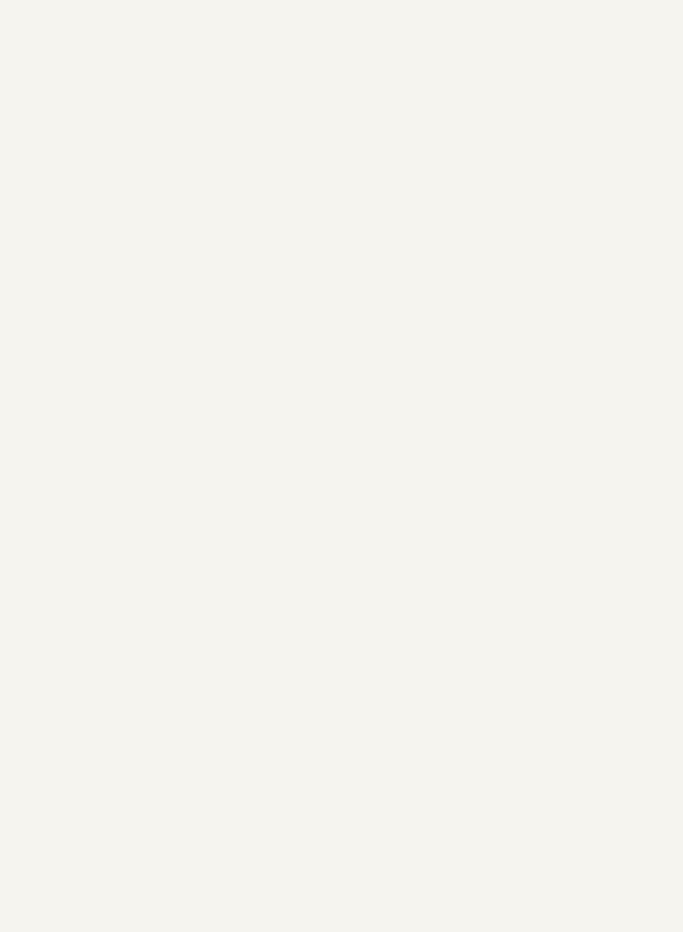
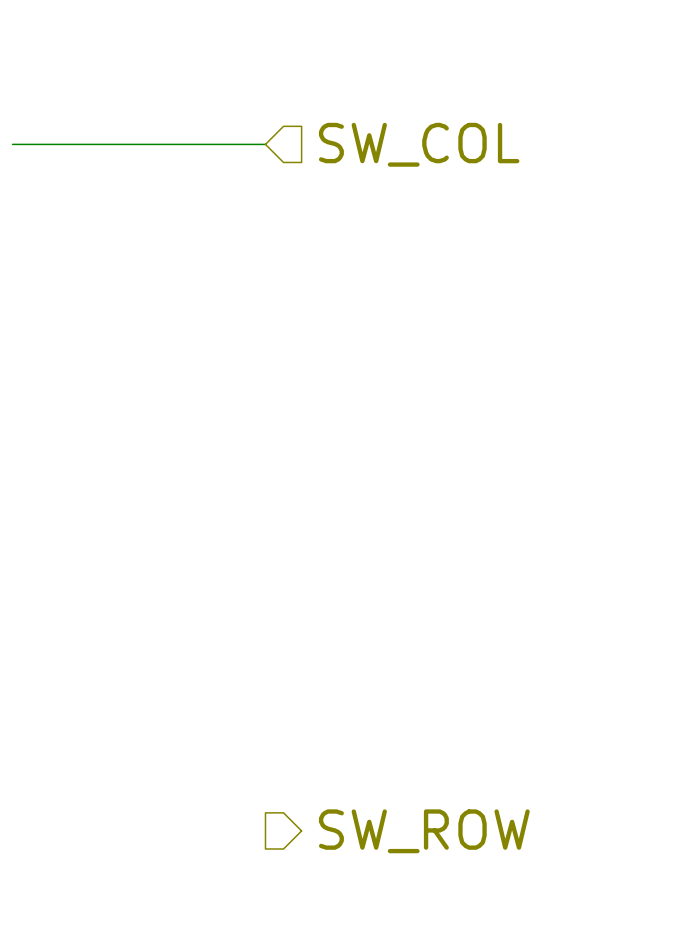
wire: none -> (12, 144) (265, 144)
hierarchical label: none -> SW_COL (419, 144)
hierarchical label: none -> SW_ROW (424, 831)

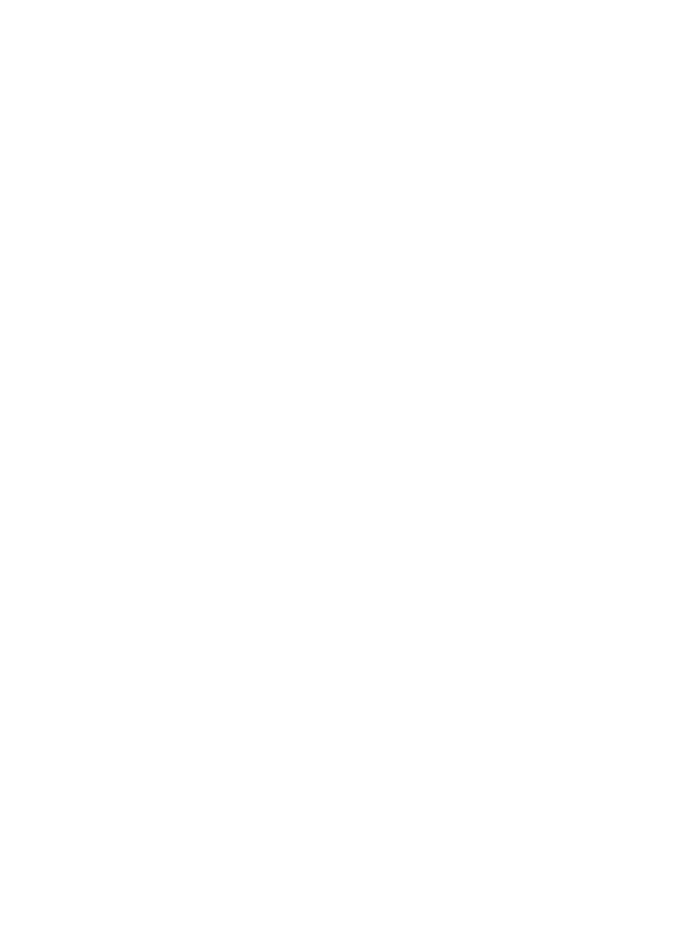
wire: (12, 144) (265, 144) -> none
hierarchical label: SW_COL (419, 144) -> none
hierarchical label: SW_ROW (424, 831) -> none

